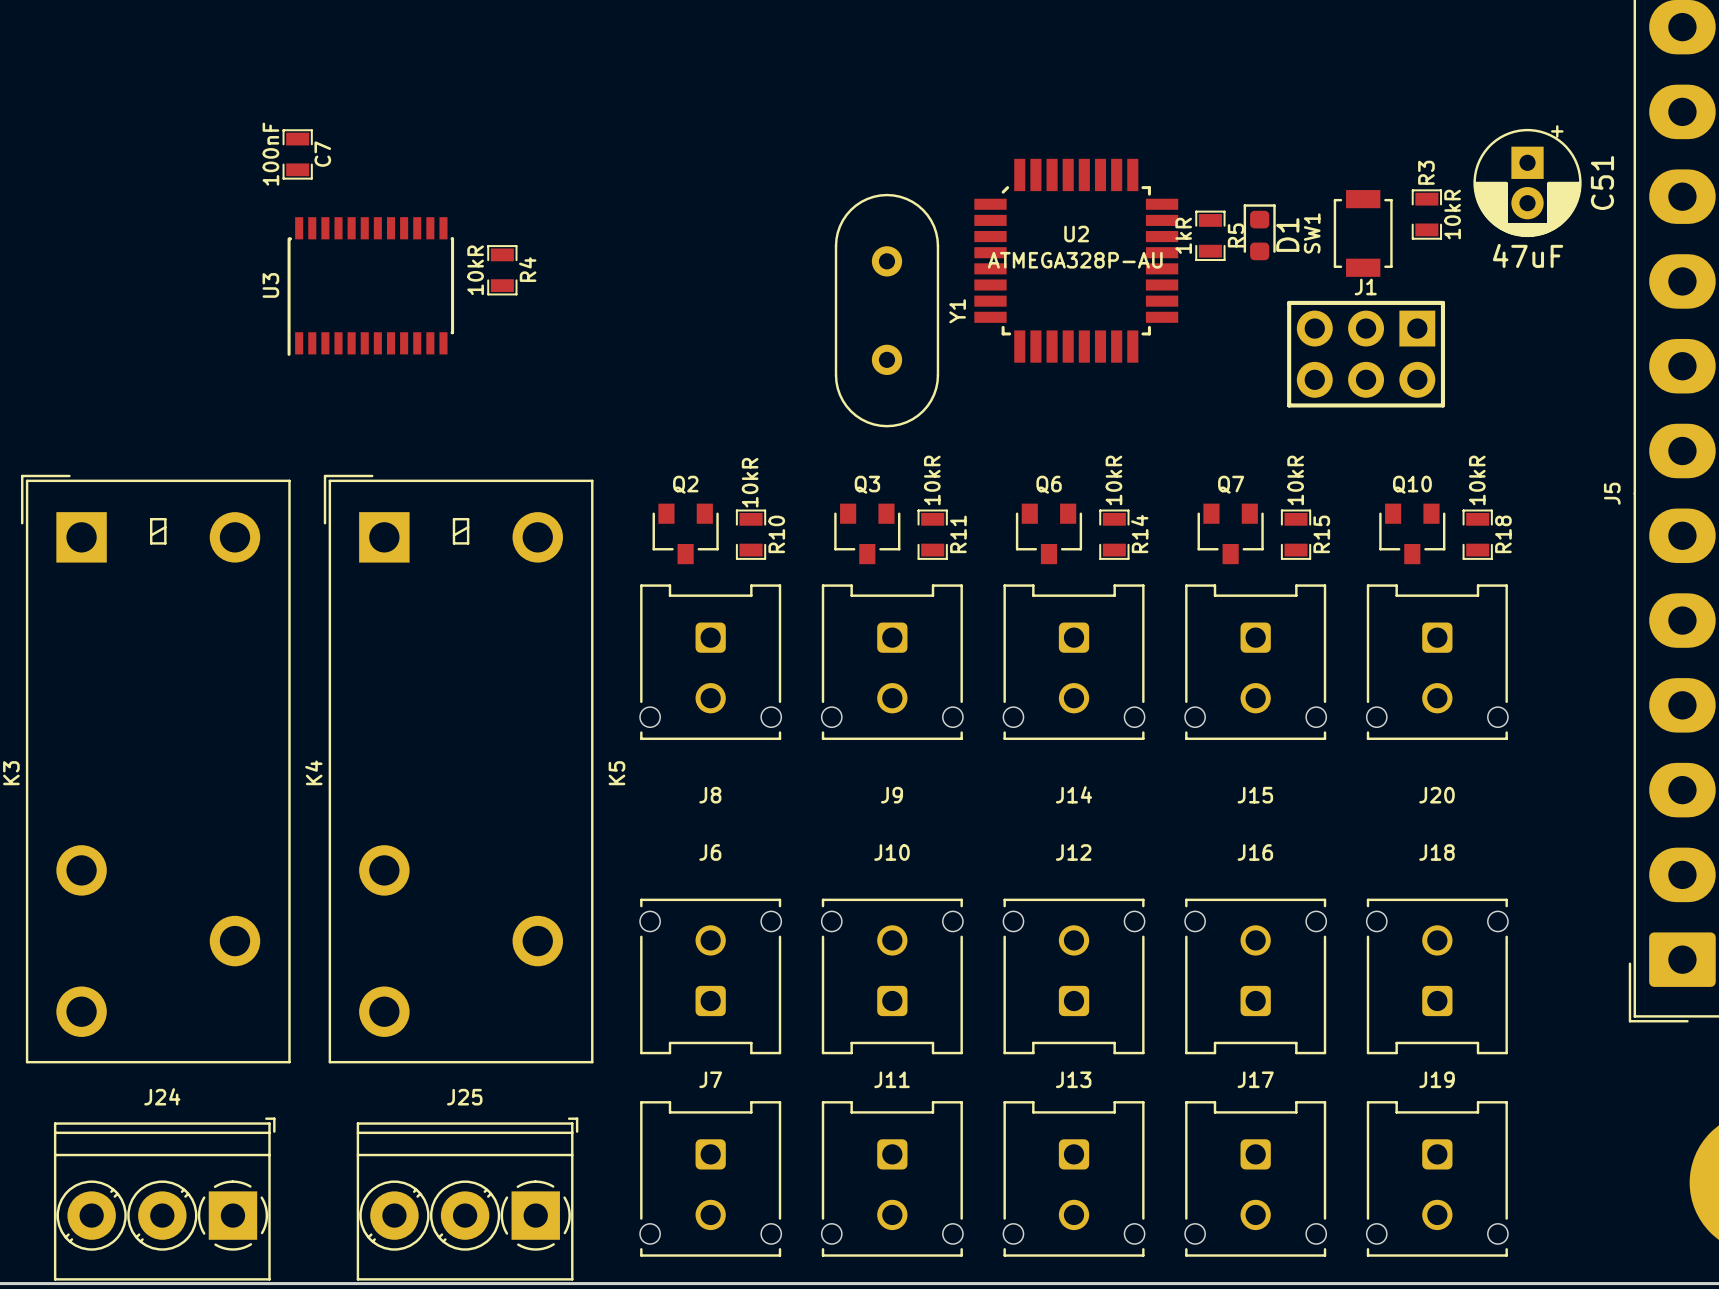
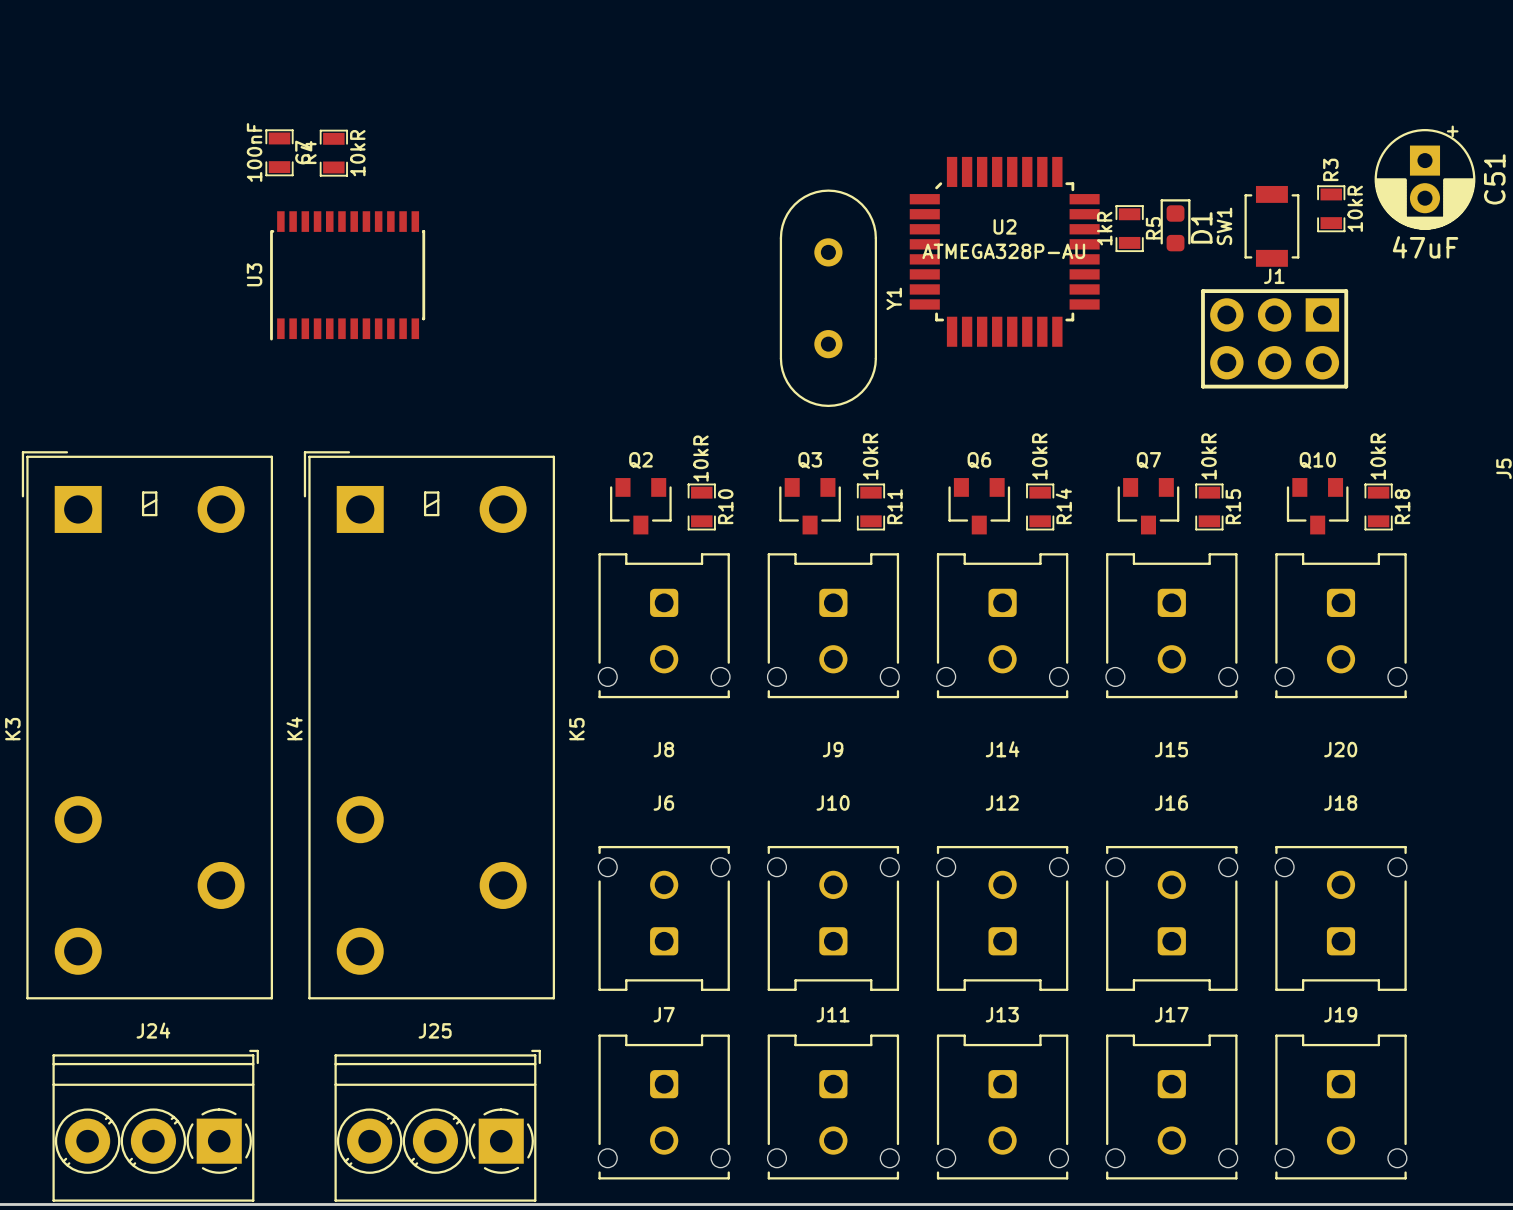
R4 rotation: 0° (502, 270) -> 180° (333, 153)
R4 position: (502, 270) -> (333, 153)

